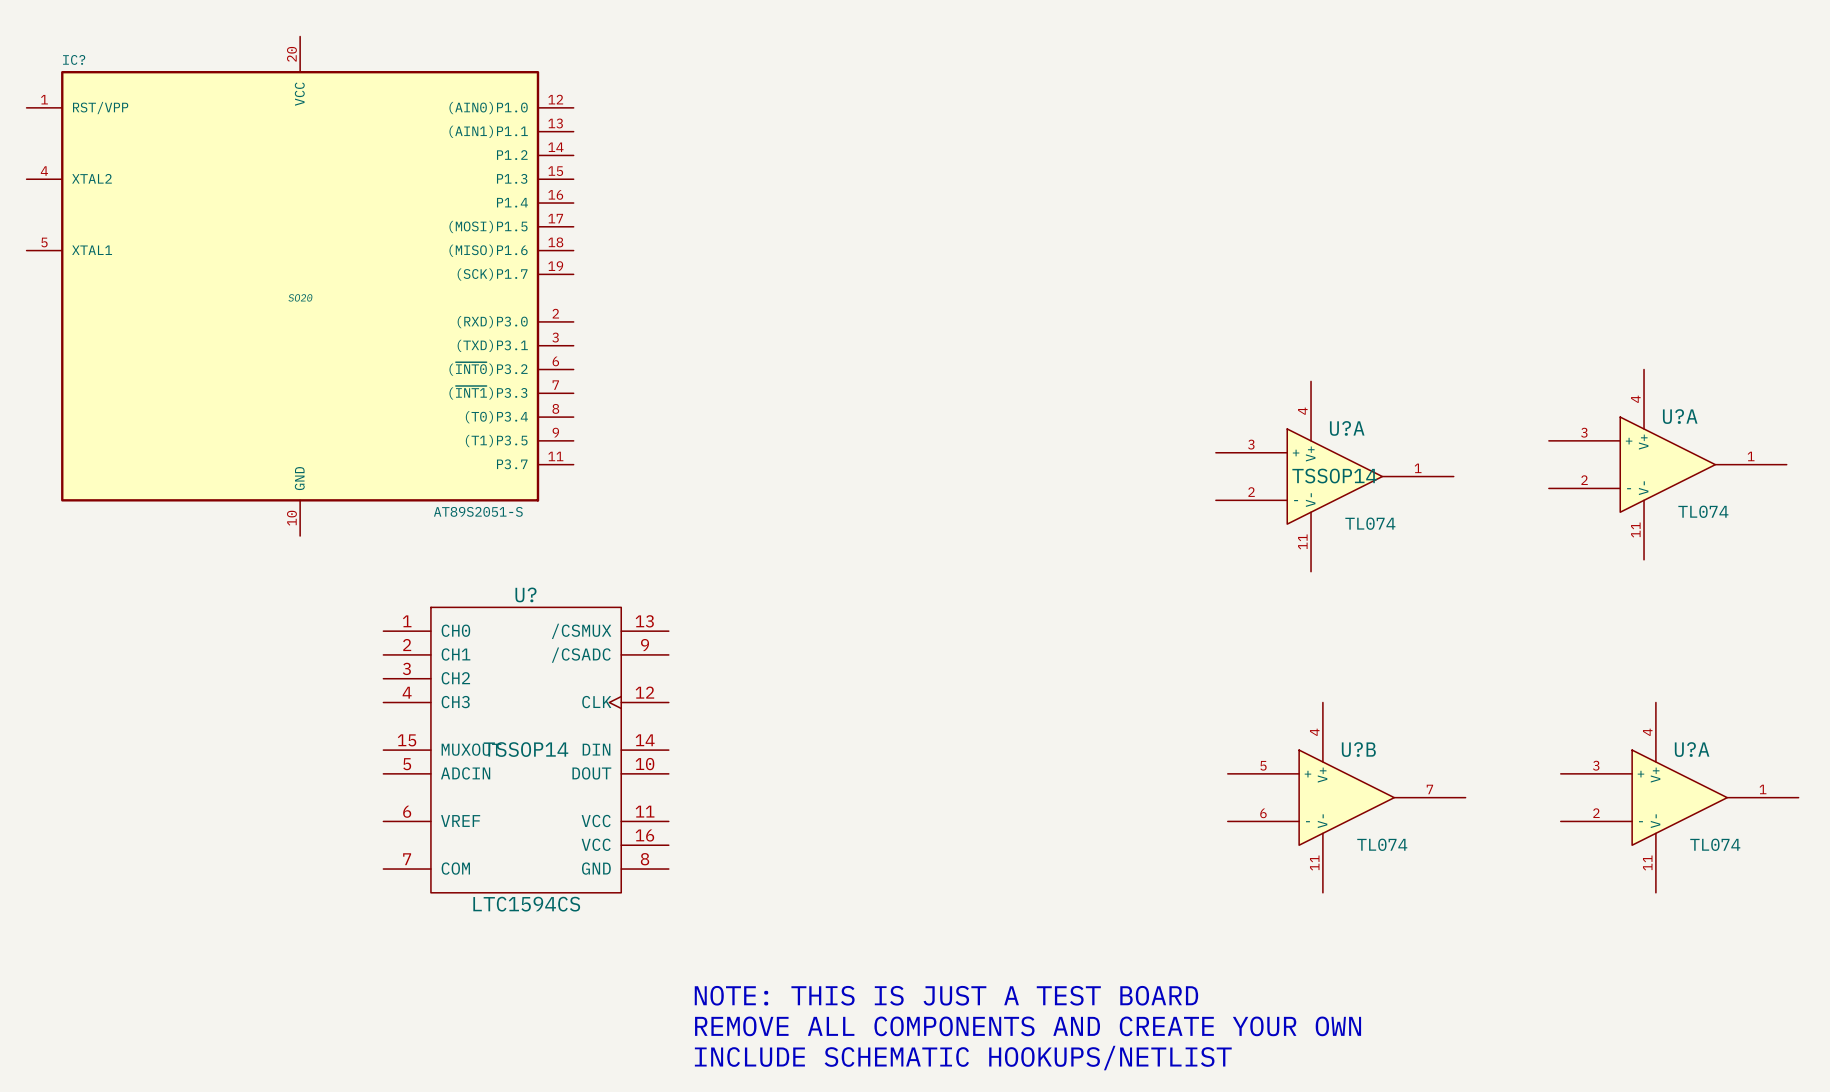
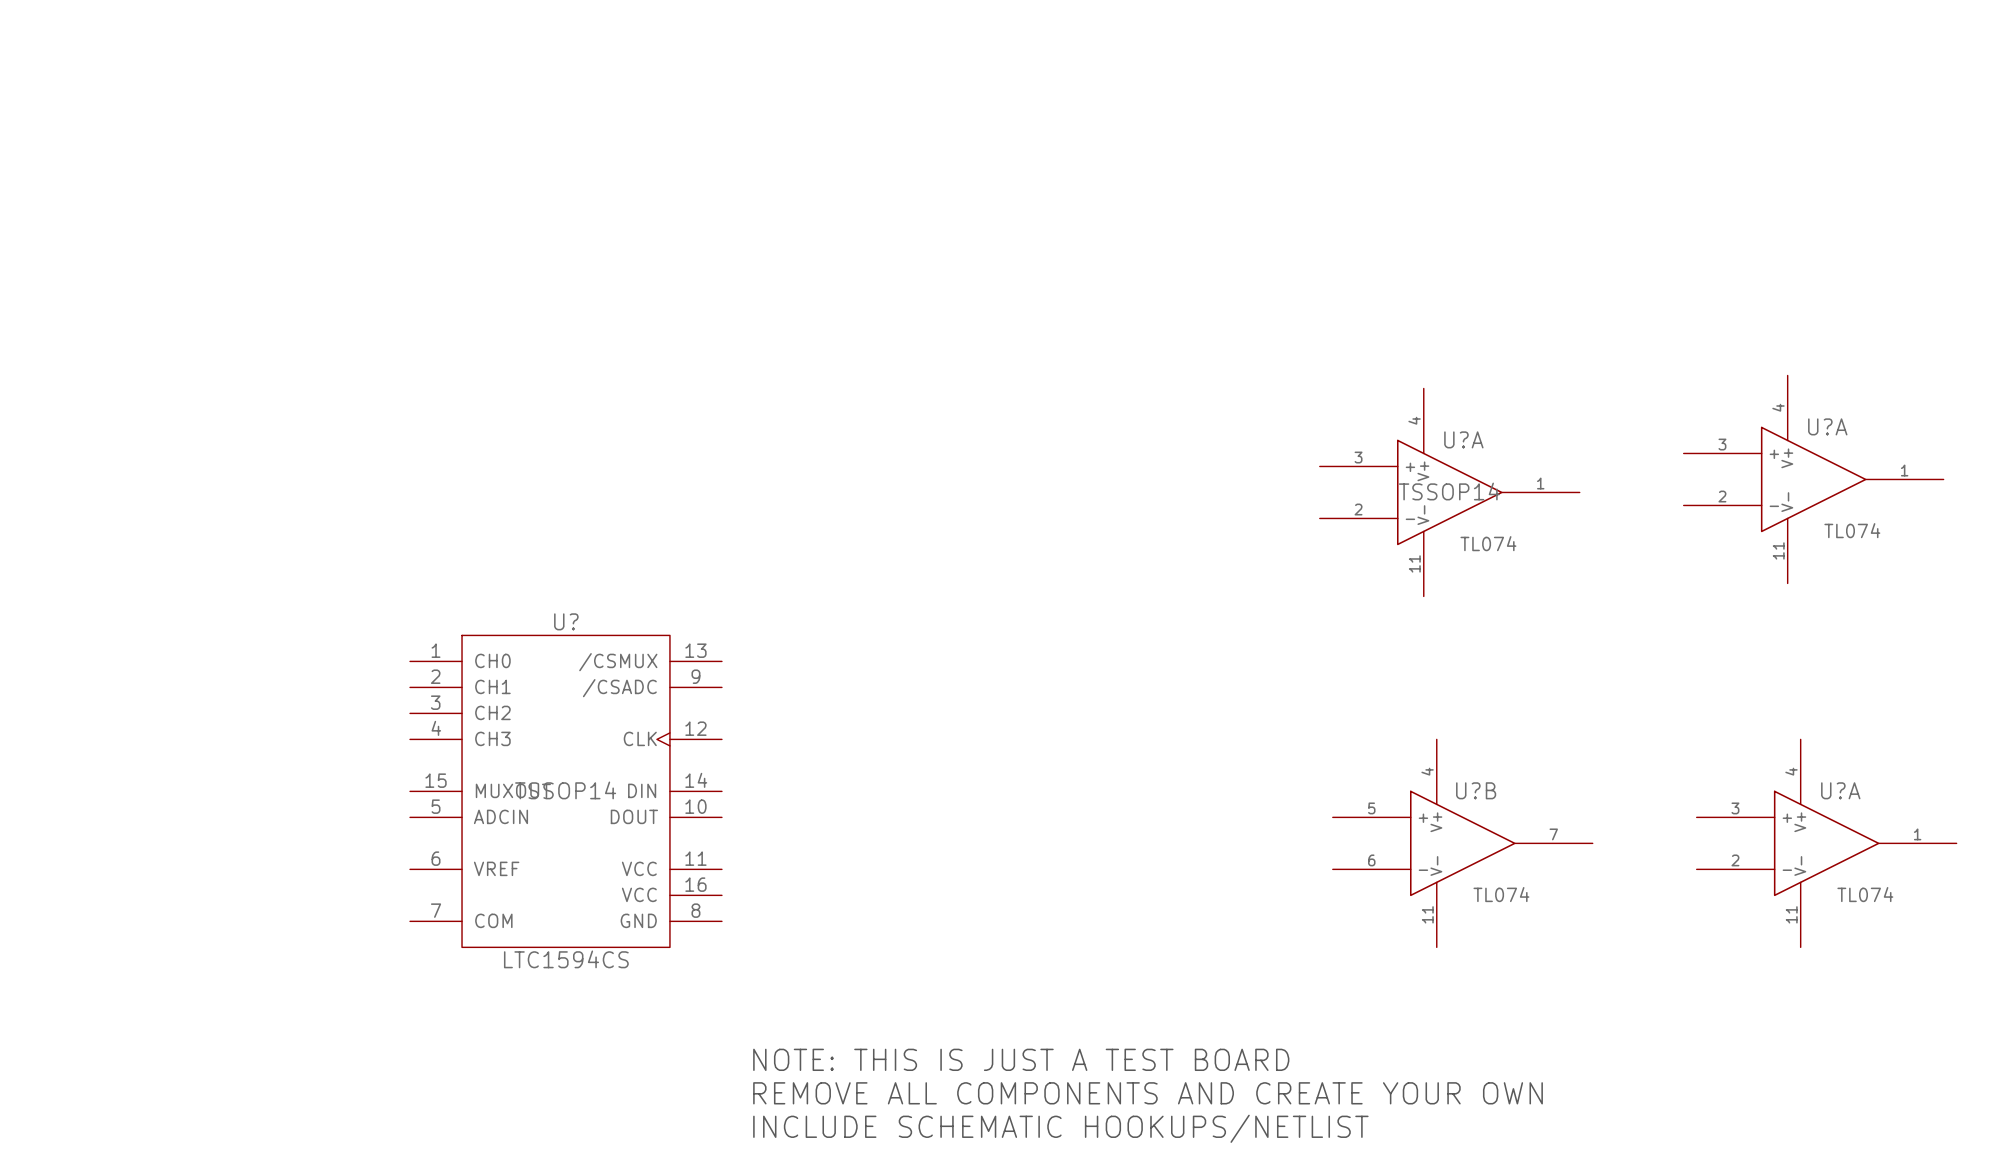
IC?: AT89S2051-S (300, 286) -> none

